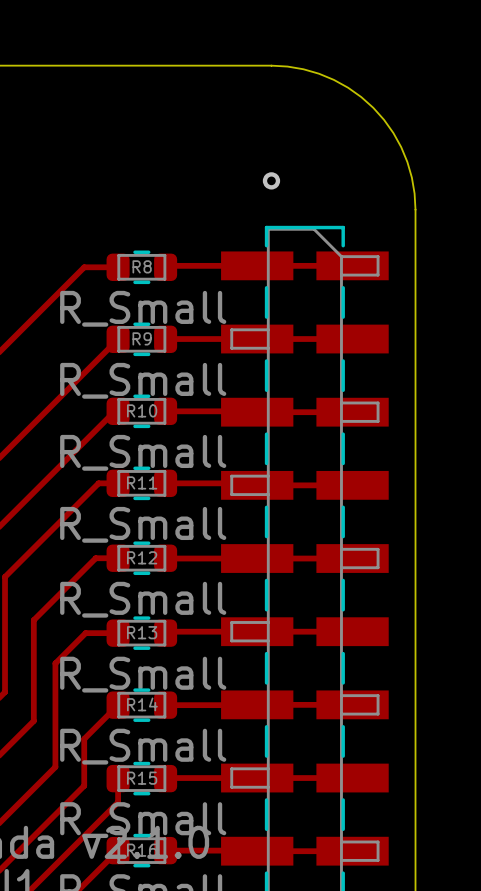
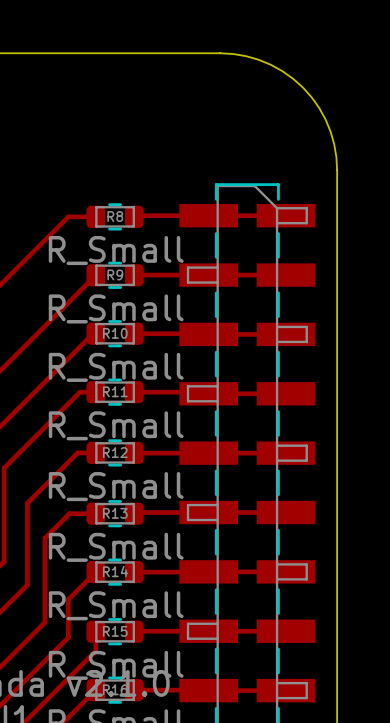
via: (271, 180) -> none

